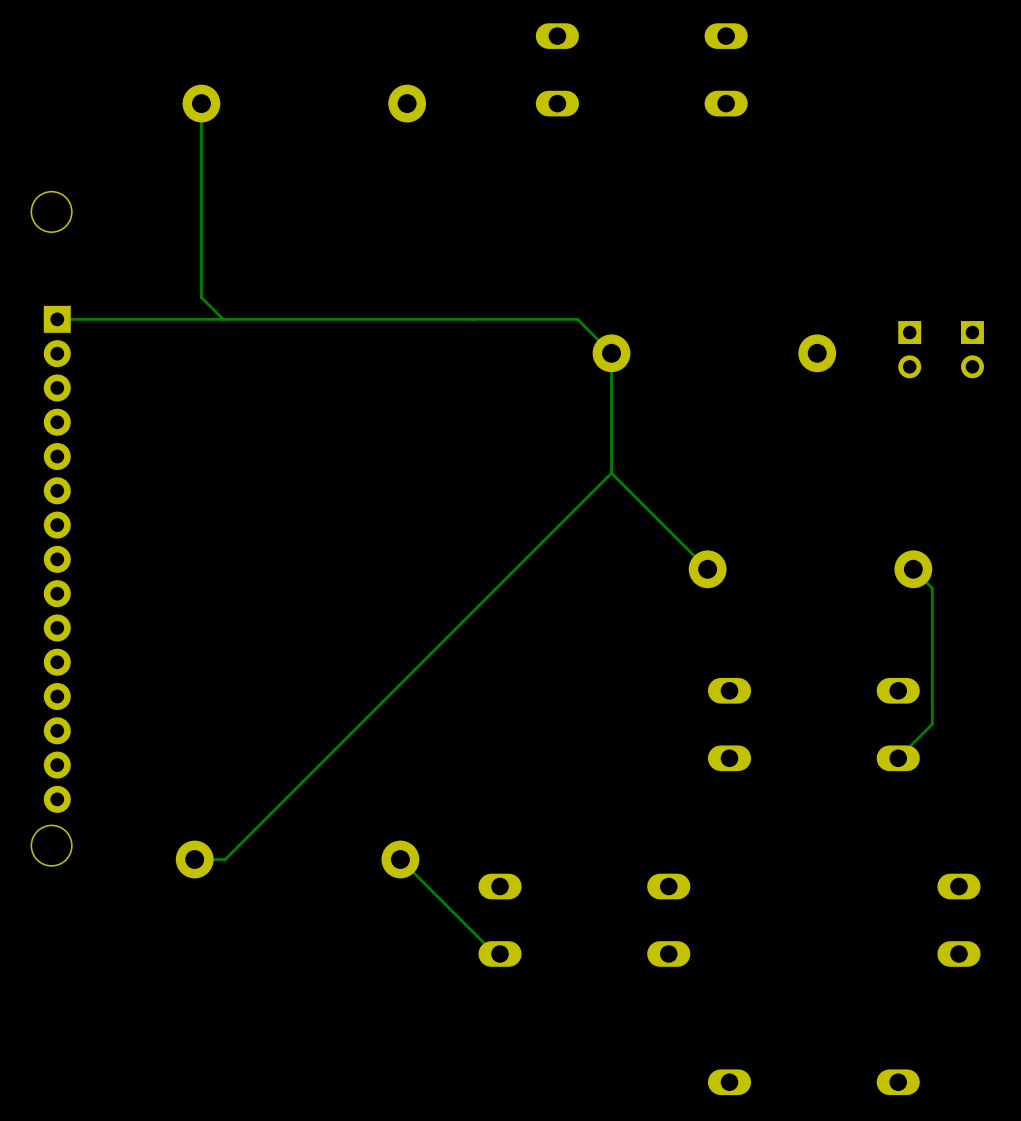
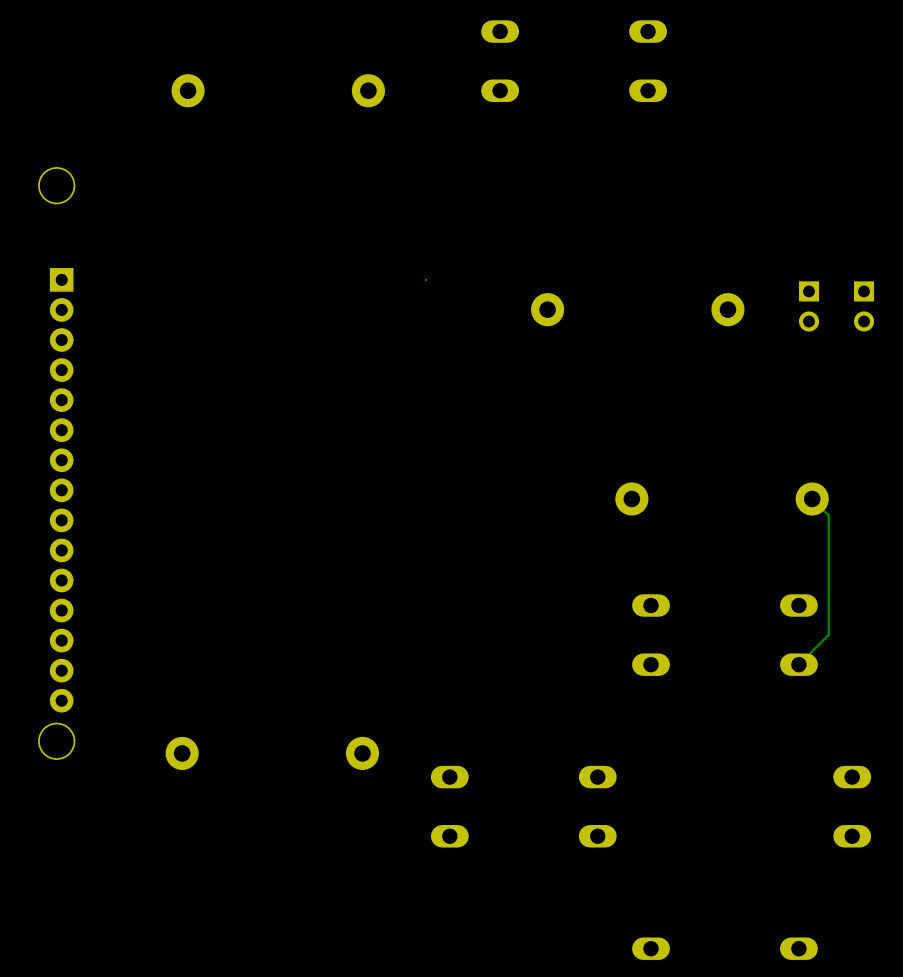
track: (201, 103) (201, 297) (223, 319) -> none
track: (57, 319) (577, 319) (611, 353) (611, 473) -> none
track: (611, 473) (225, 859) (194, 859) -> none
track: (611, 473) (707, 569) -> none
track: (400, 859) (494, 953) (500, 953) -> none

